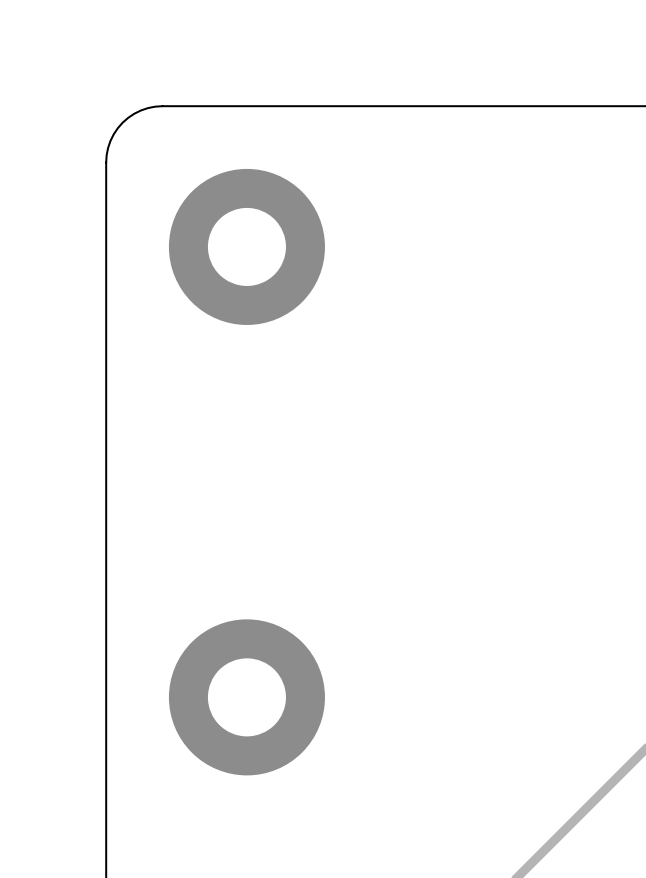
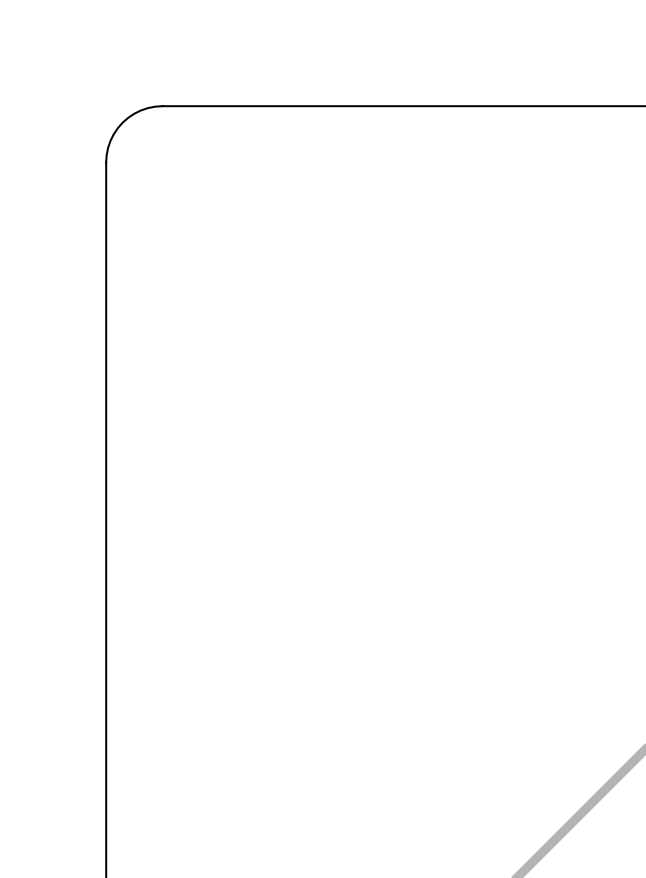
part: (246, 246) -> none
part: (246, 697) -> none

